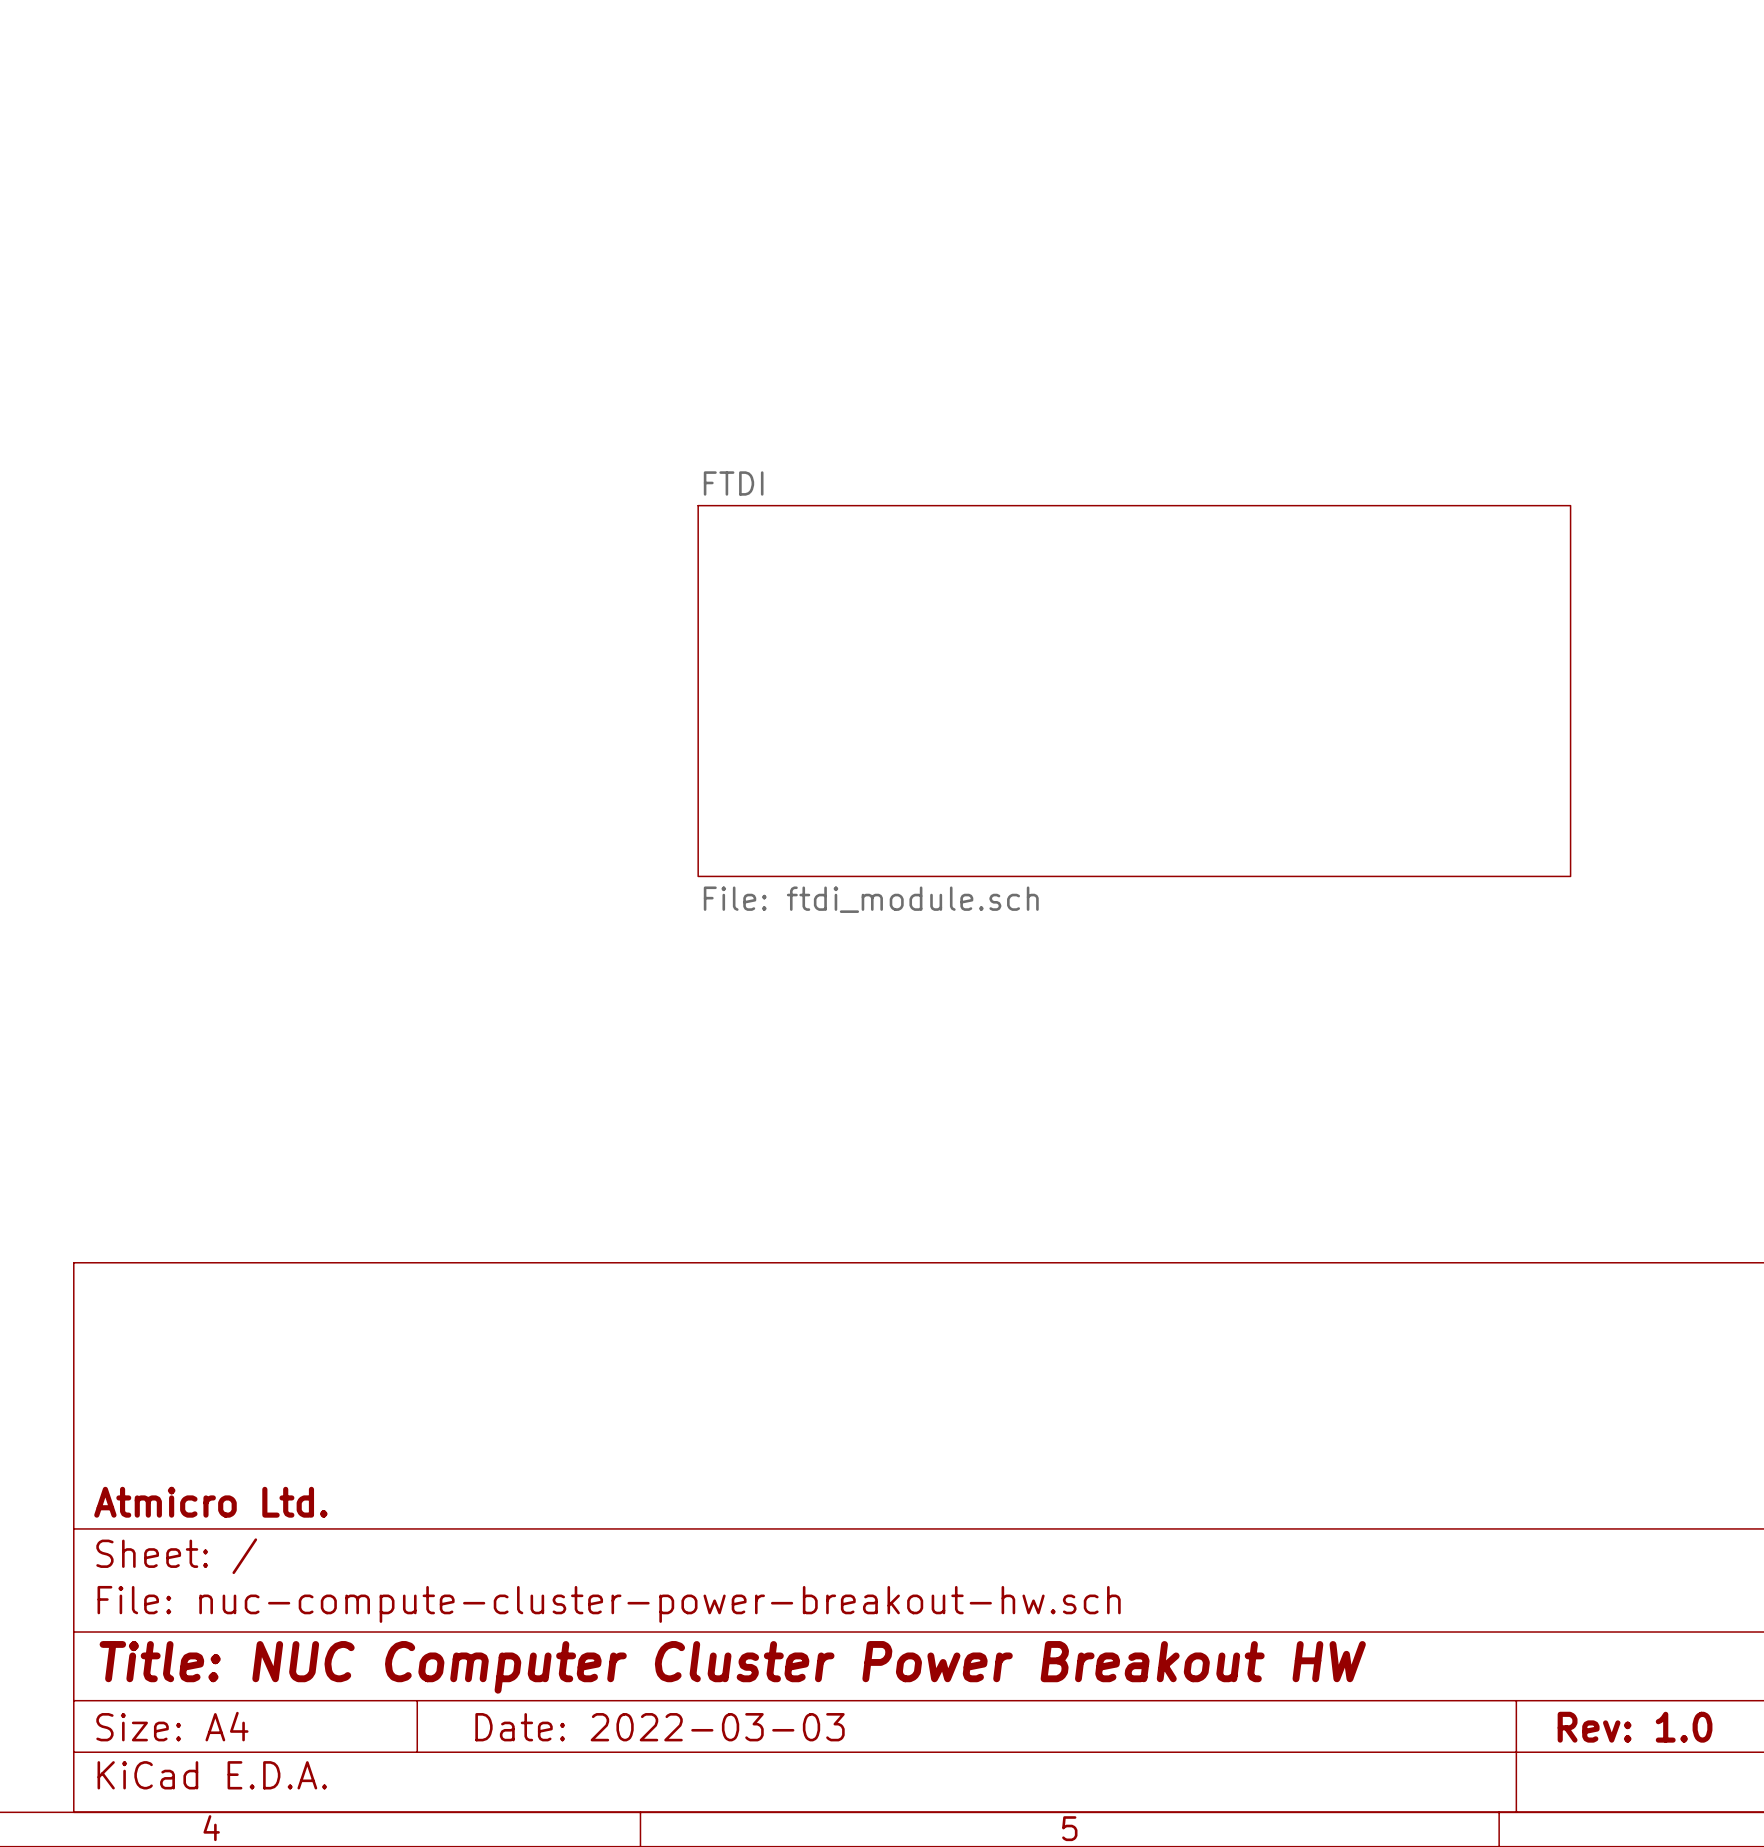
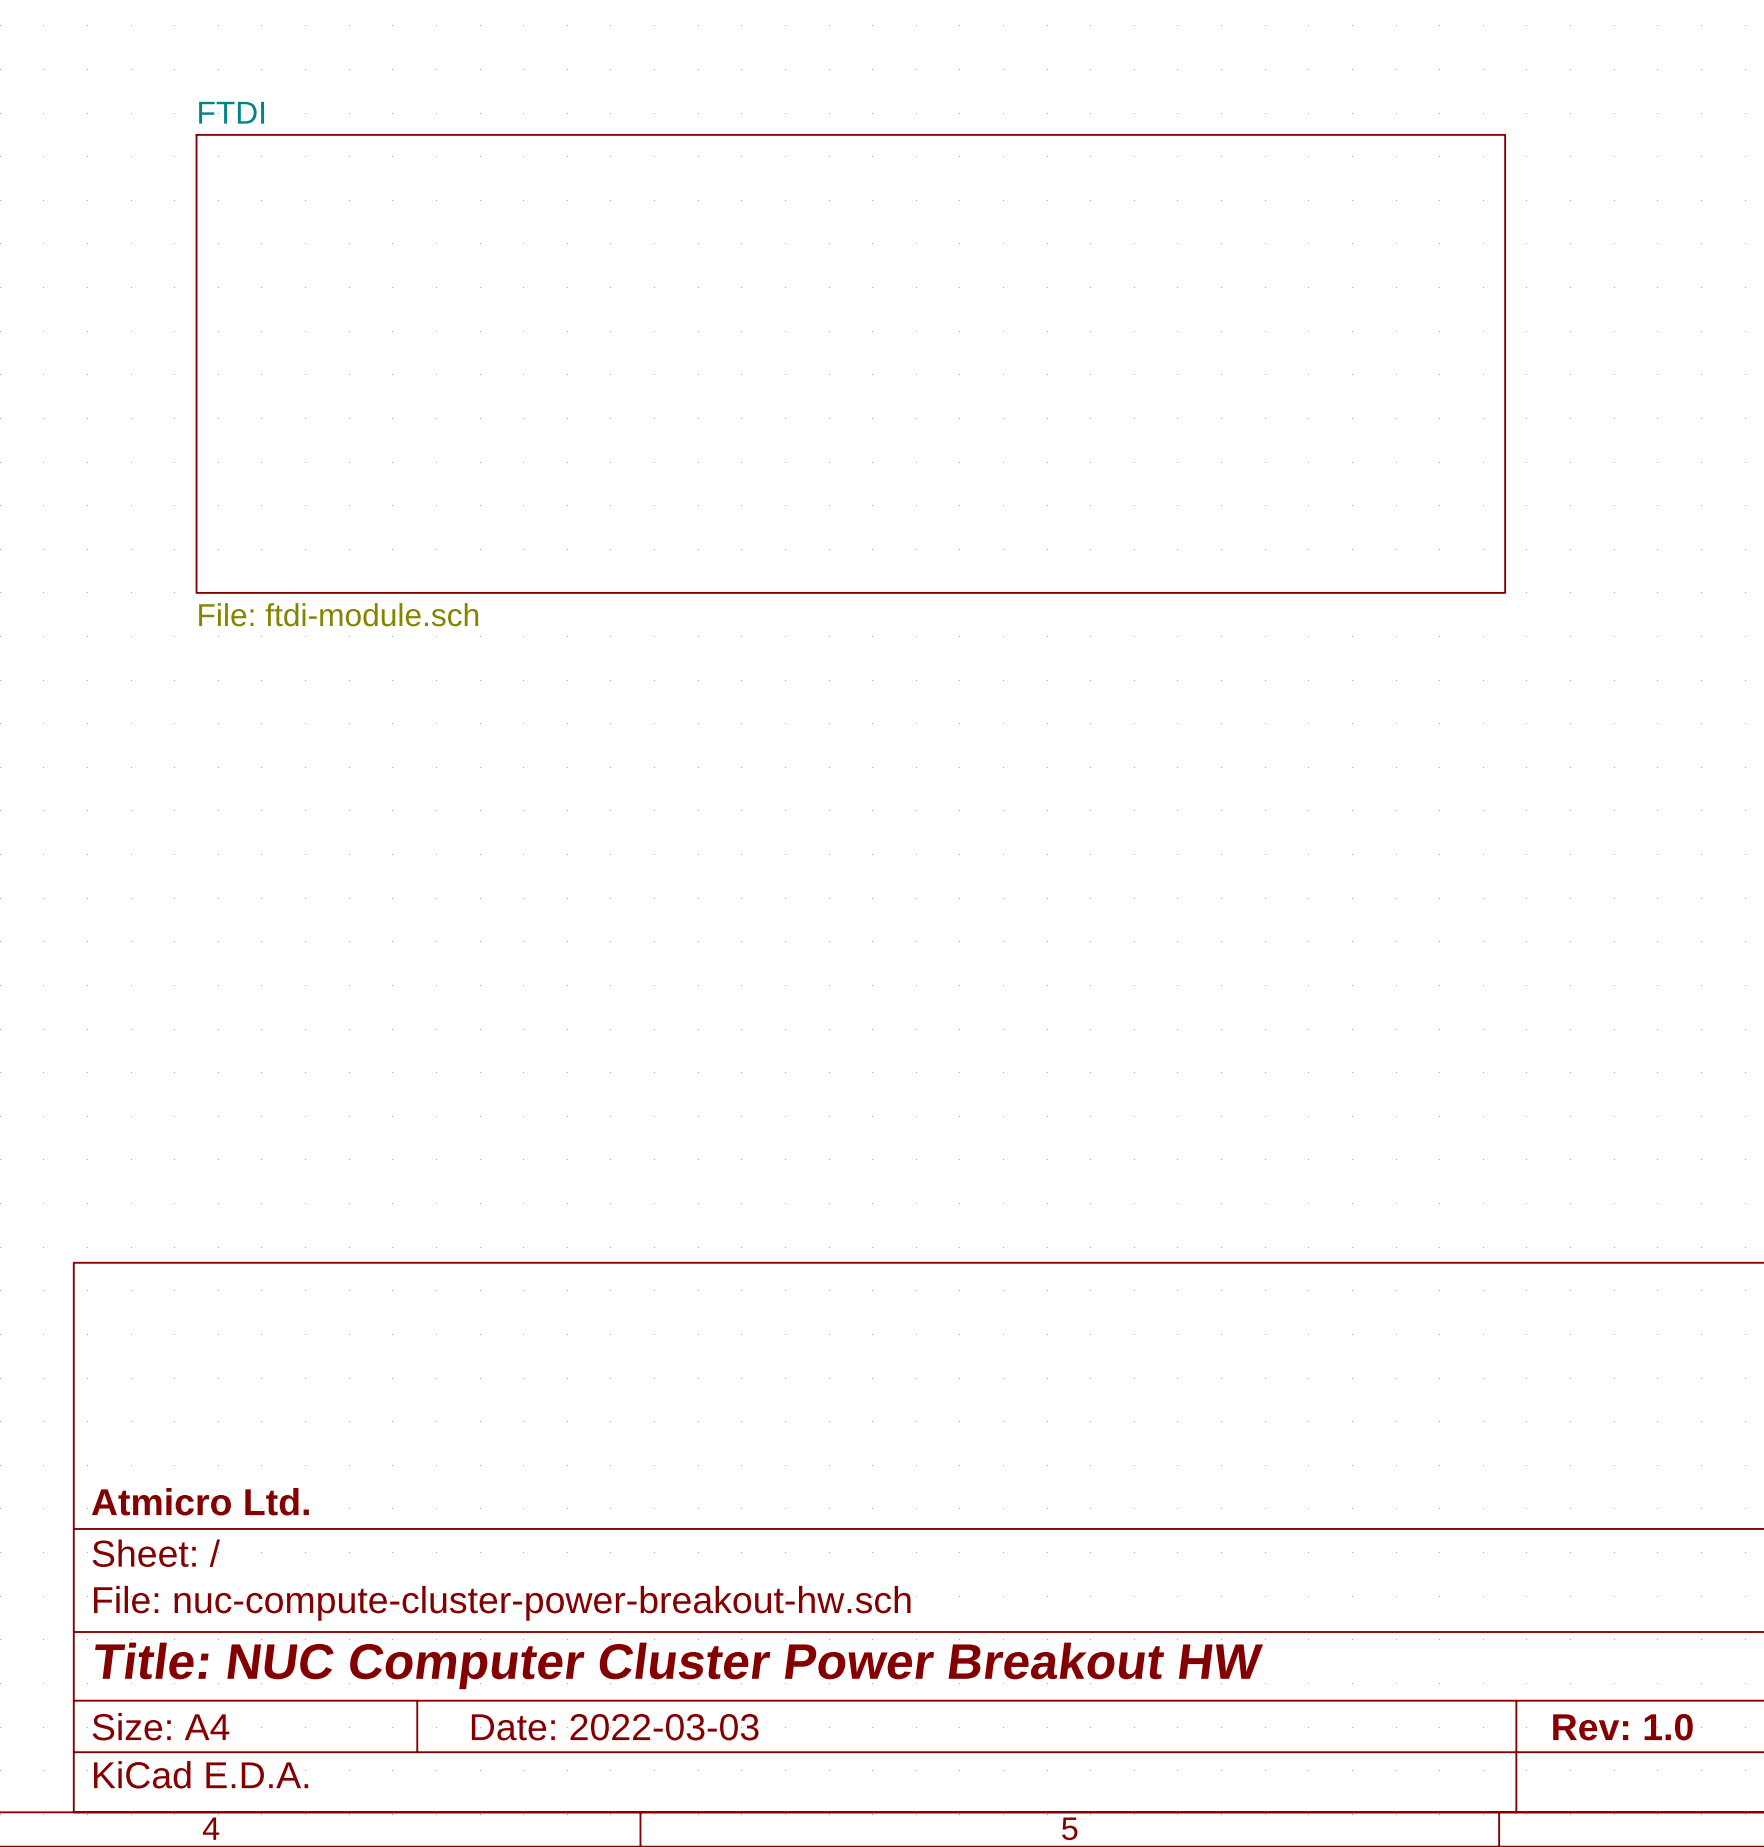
sheet FTDI: none -> File: ftdi-module.sch (850, 363)
sheet FTDI: File: ftdi_module.sch (1134, 691) -> none

